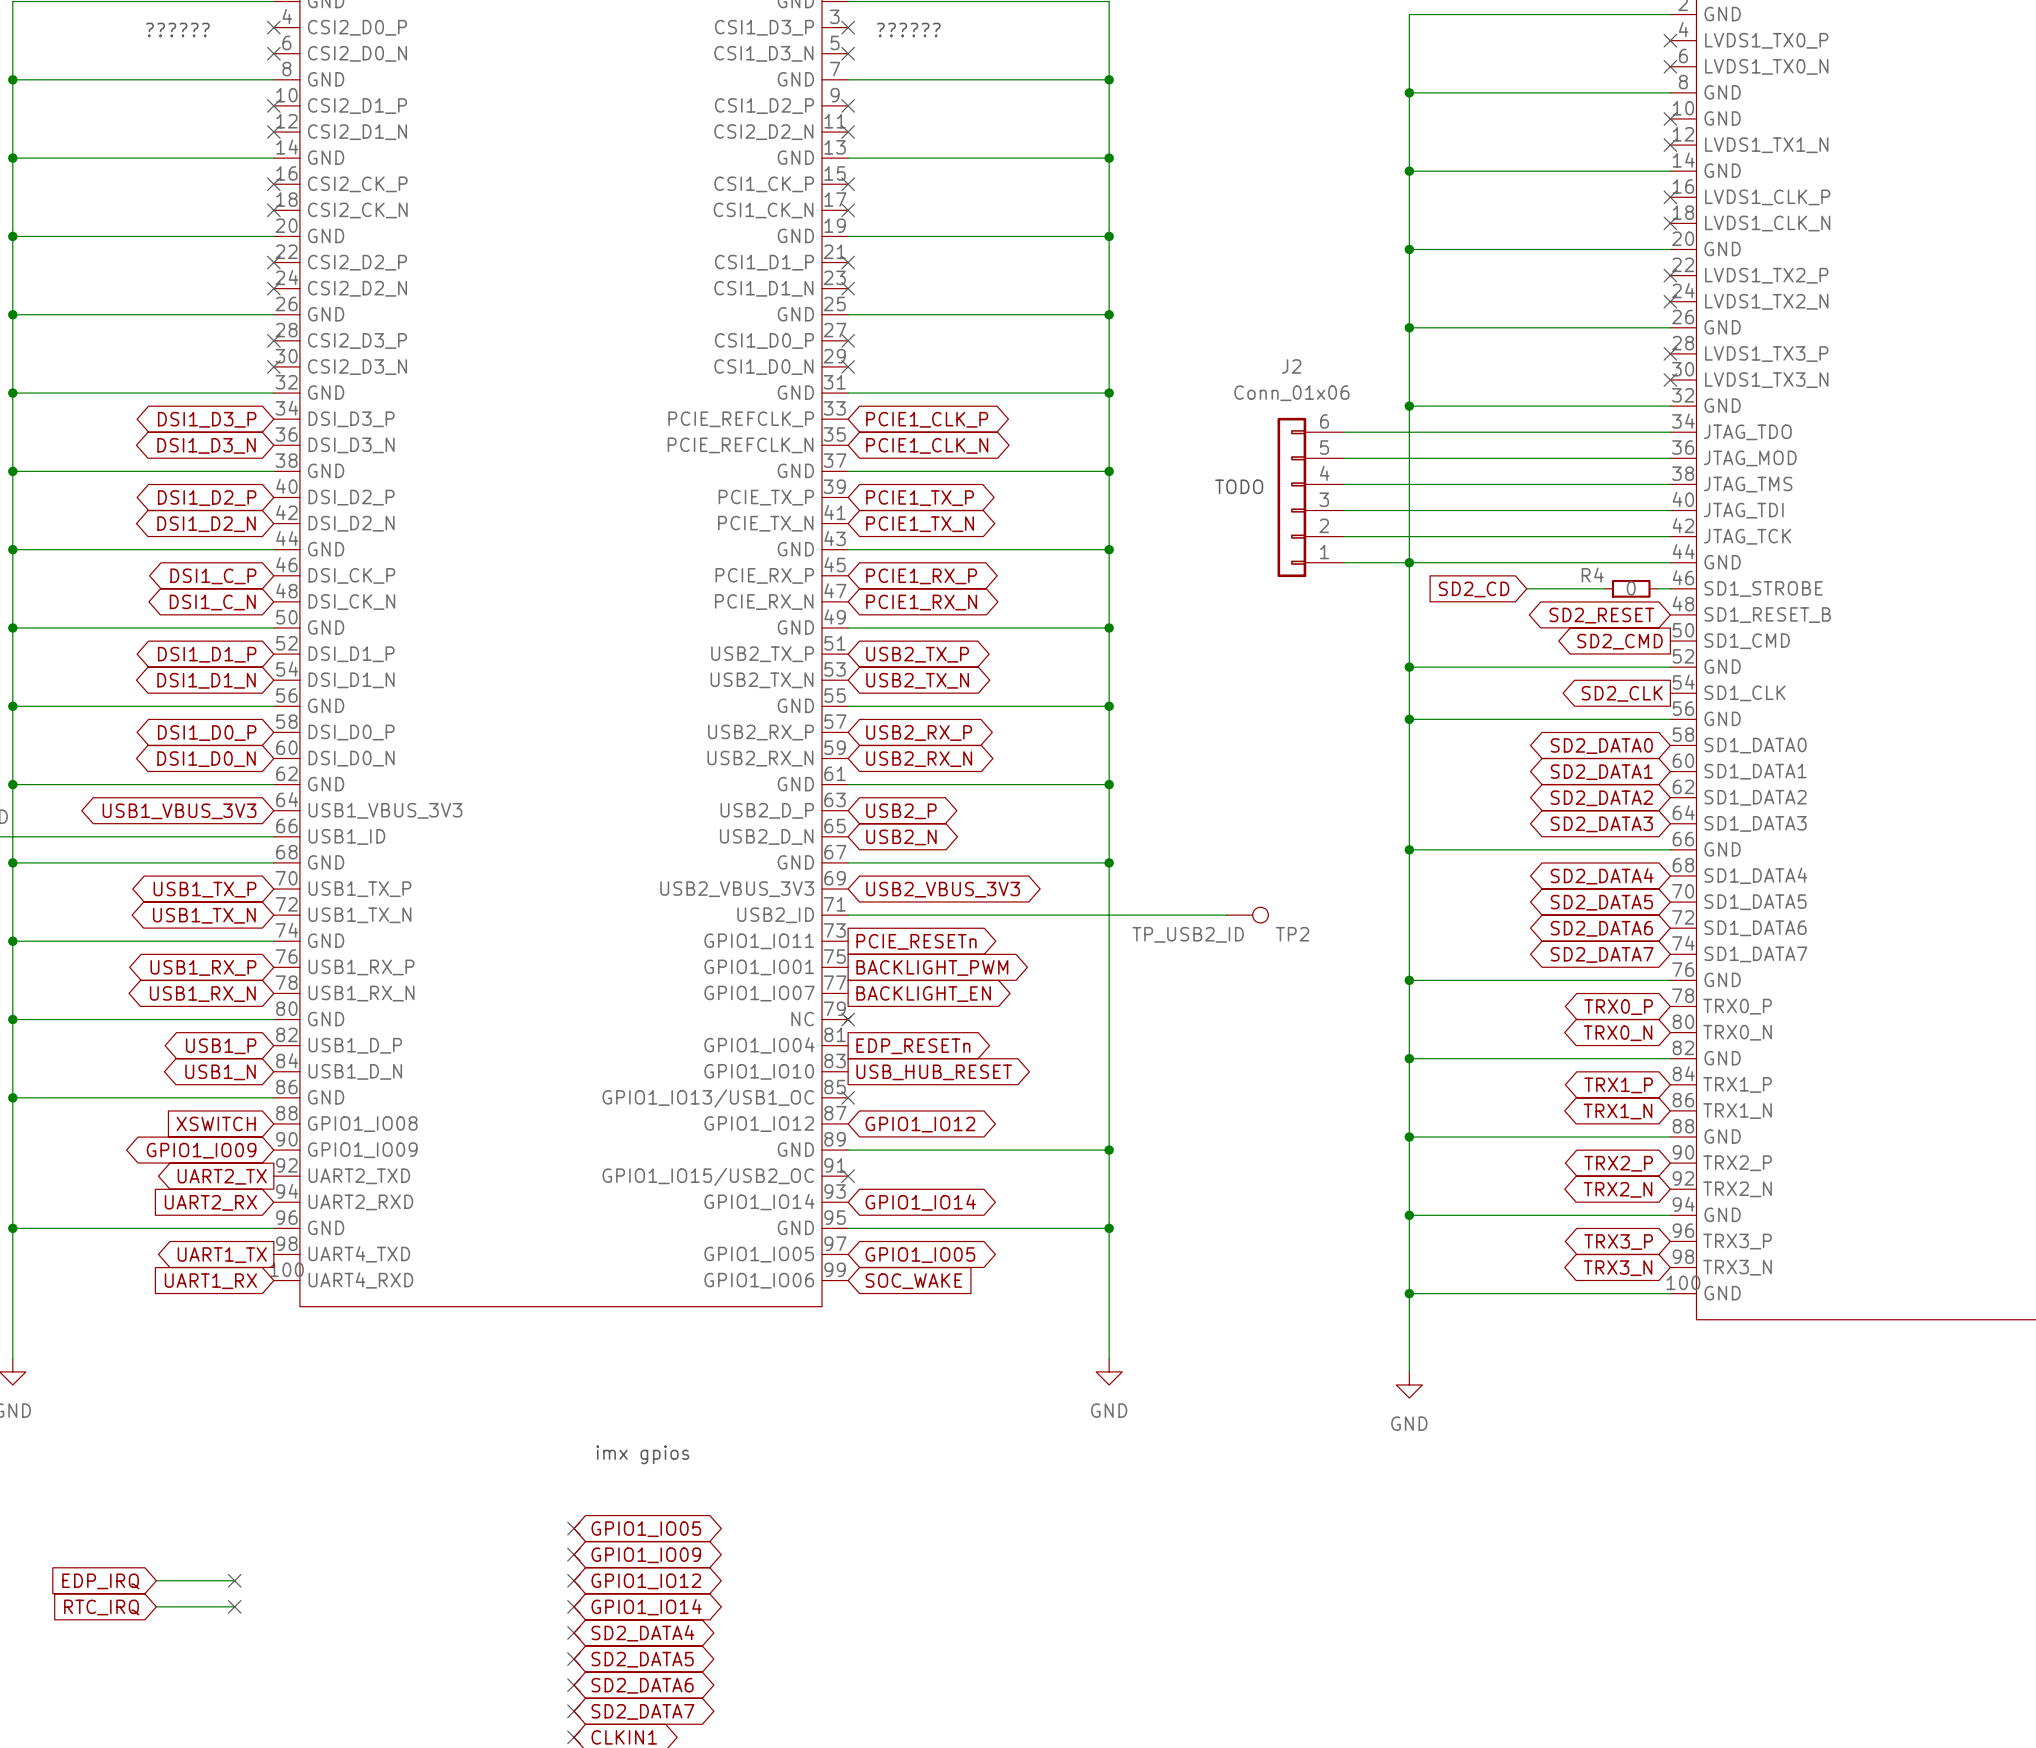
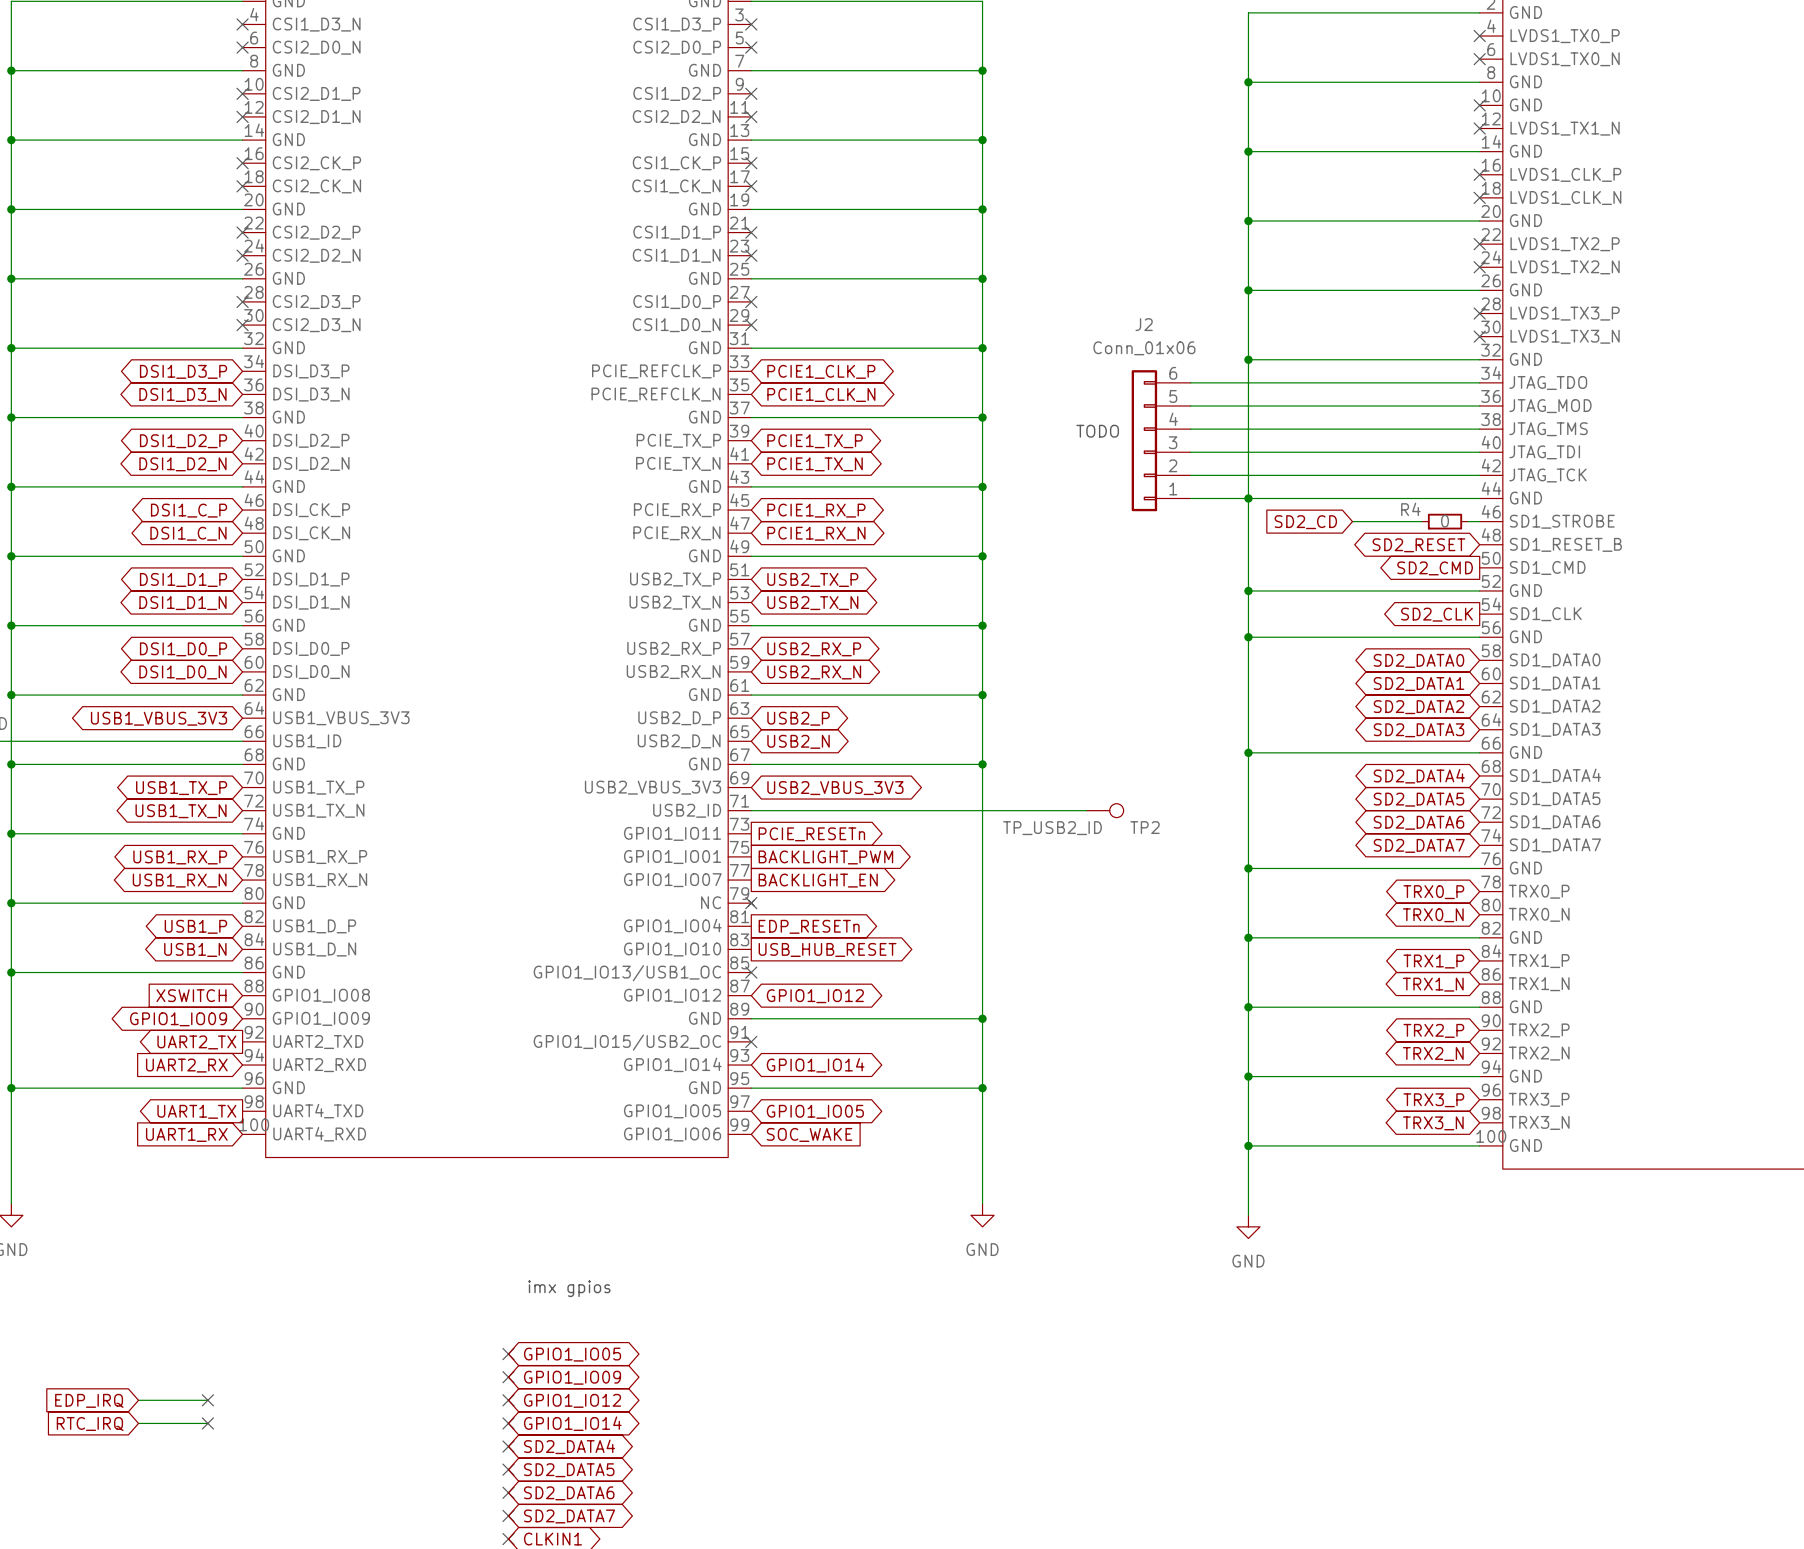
part pin name: CSI2_D0_P (357, 27) -> CSI1_D3_N (316, 24)
text: ?????? (177, 29) -> none
text: ?????? (908, 29) -> none
part pin name: CSI1_D3_N (763, 53) -> CSI2_D0_P (677, 47)

